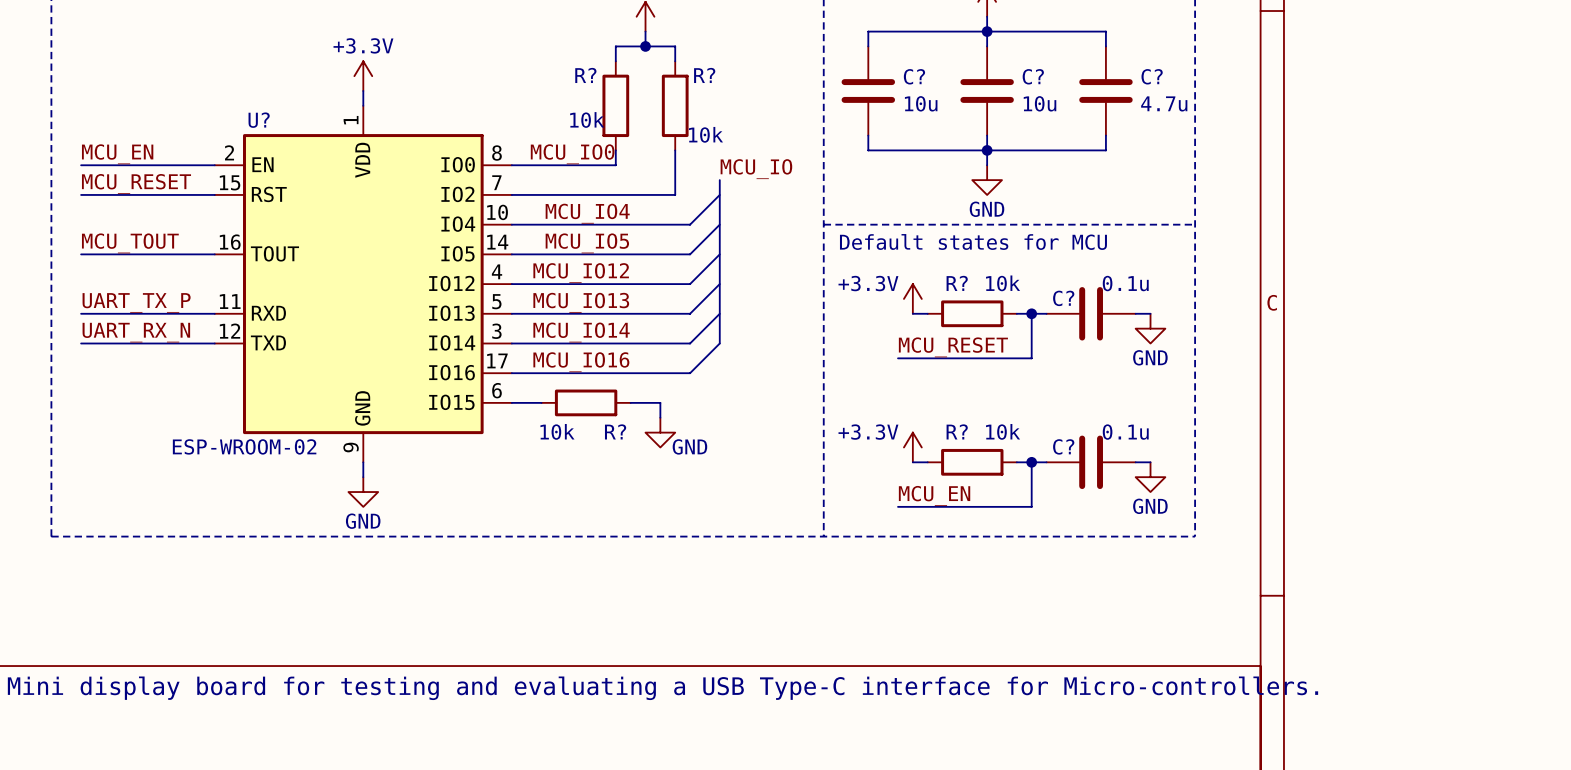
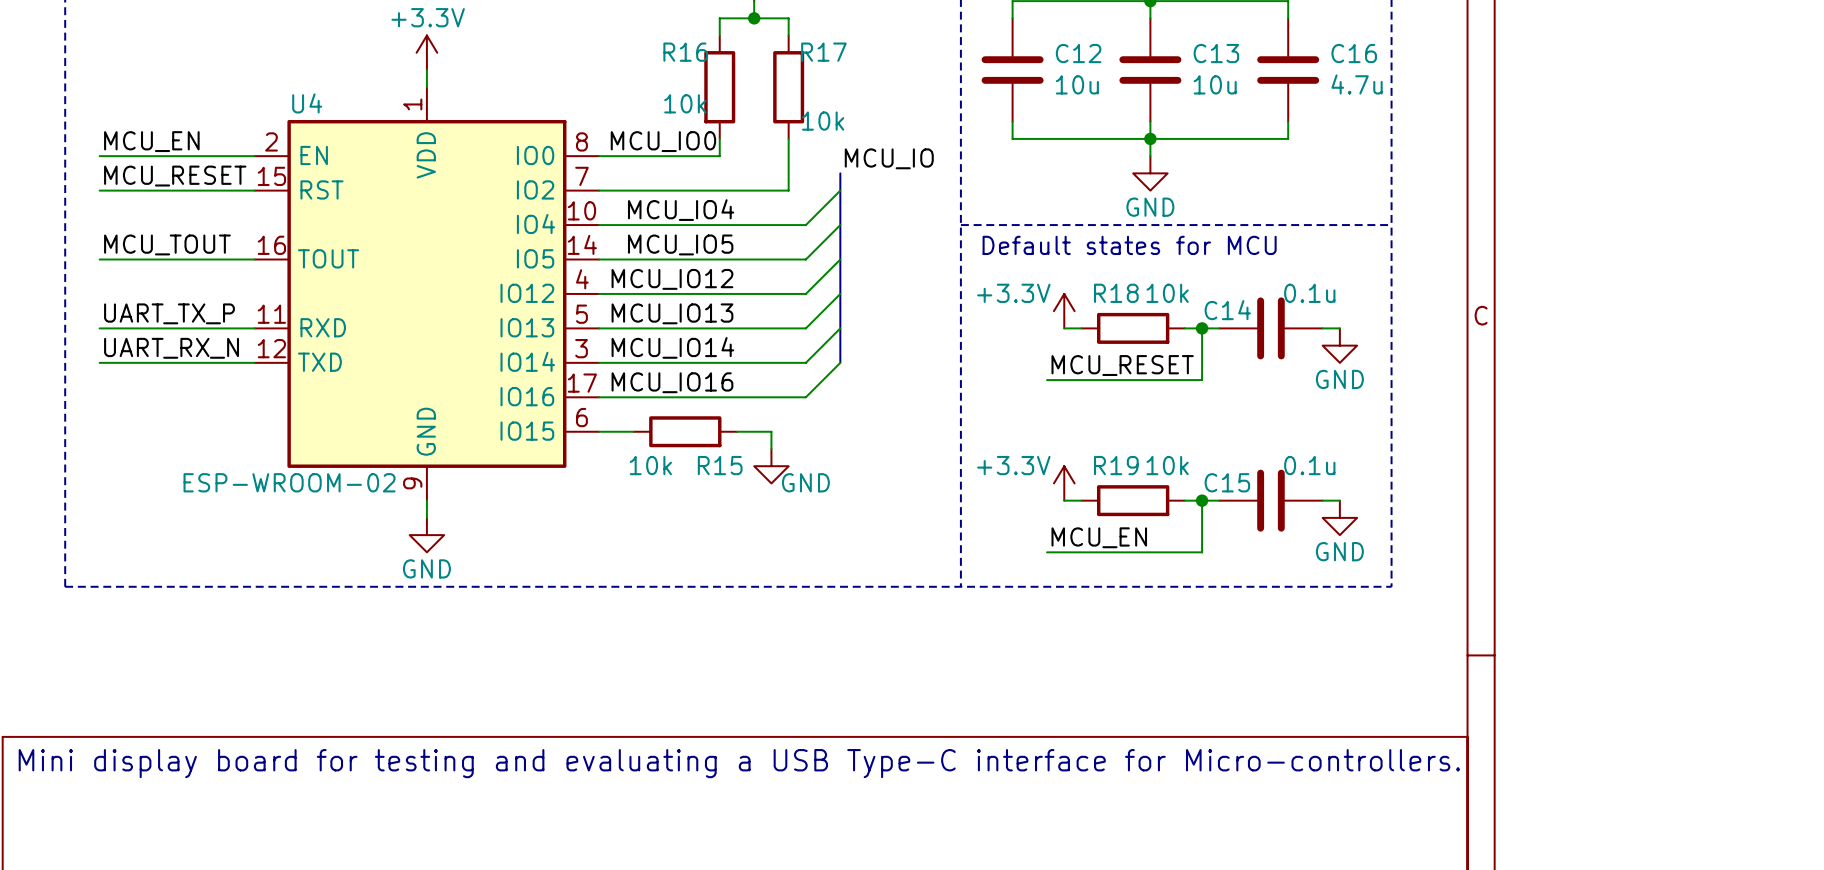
R? name: R? (585, 75) -> R16 (685, 52)
R? name: R? (704, 75) -> R17 (823, 52)
C? name: C? (914, 76) -> C12 (1078, 53)
C? name: C? (1033, 76) -> C13 (1216, 53)
C? name: C? (1152, 76) -> C16 (1354, 53)
U? name: U? (259, 120) -> U4 (307, 103)
R? name: R? (957, 283) -> R18 (1116, 293)
C? name: C? (1063, 298) -> C14 (1227, 310)
R? name: R? (615, 431) -> R15 (720, 465)
R? name: R? (957, 431) -> R19 (1116, 465)
C? name: C? (1063, 446) -> C15 (1227, 482)

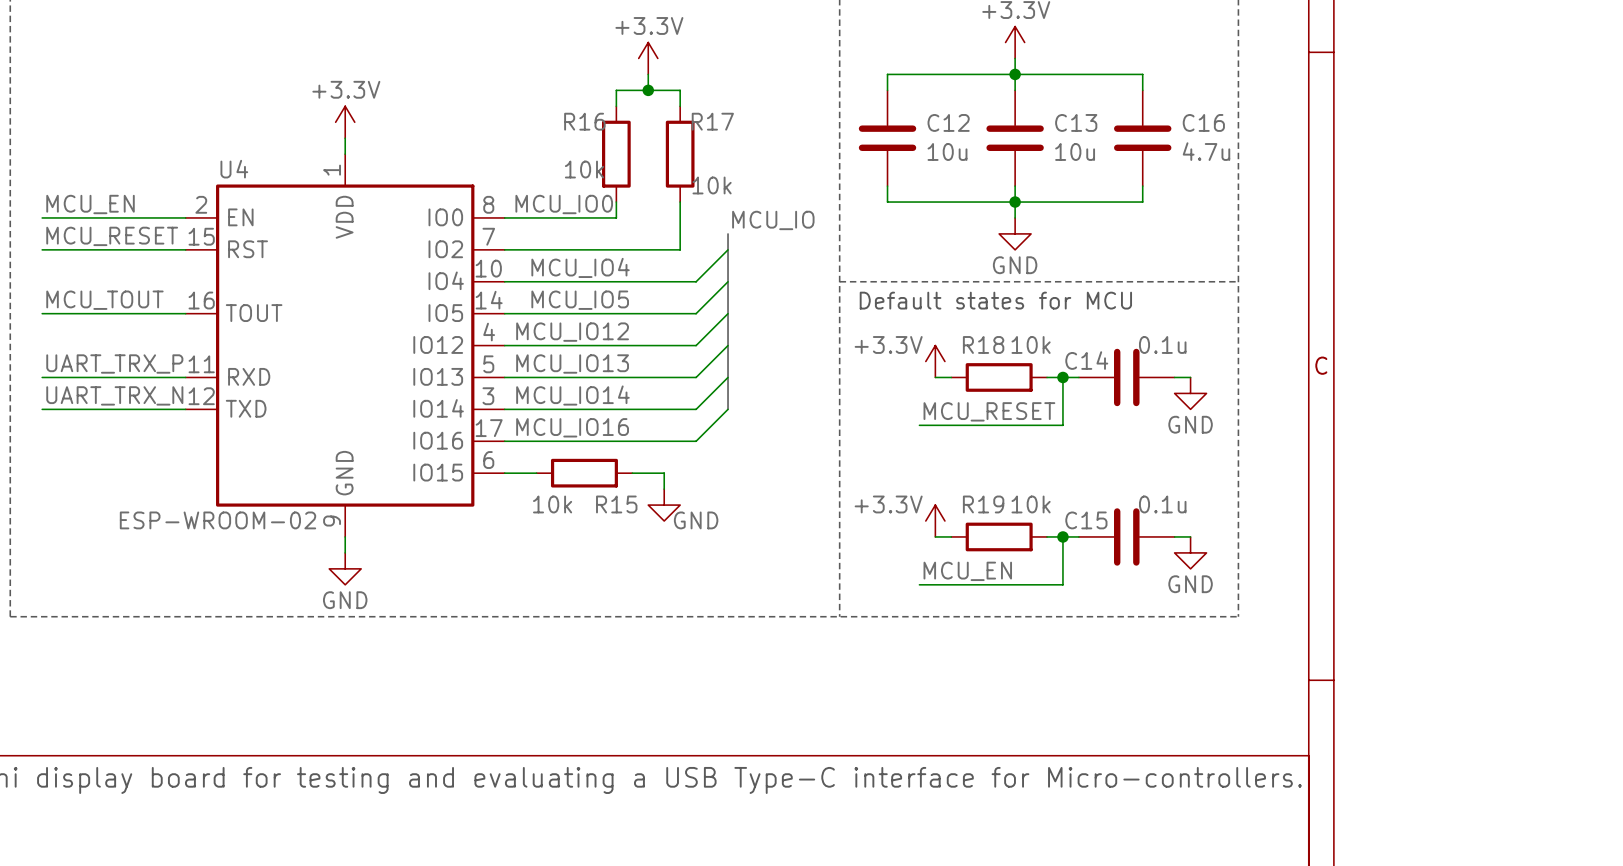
label: UART_TX_P (169, 313) -> UART_TRX_P (114, 364)
label: UART_RX_N (171, 348) -> UART_TRX_N (114, 395)

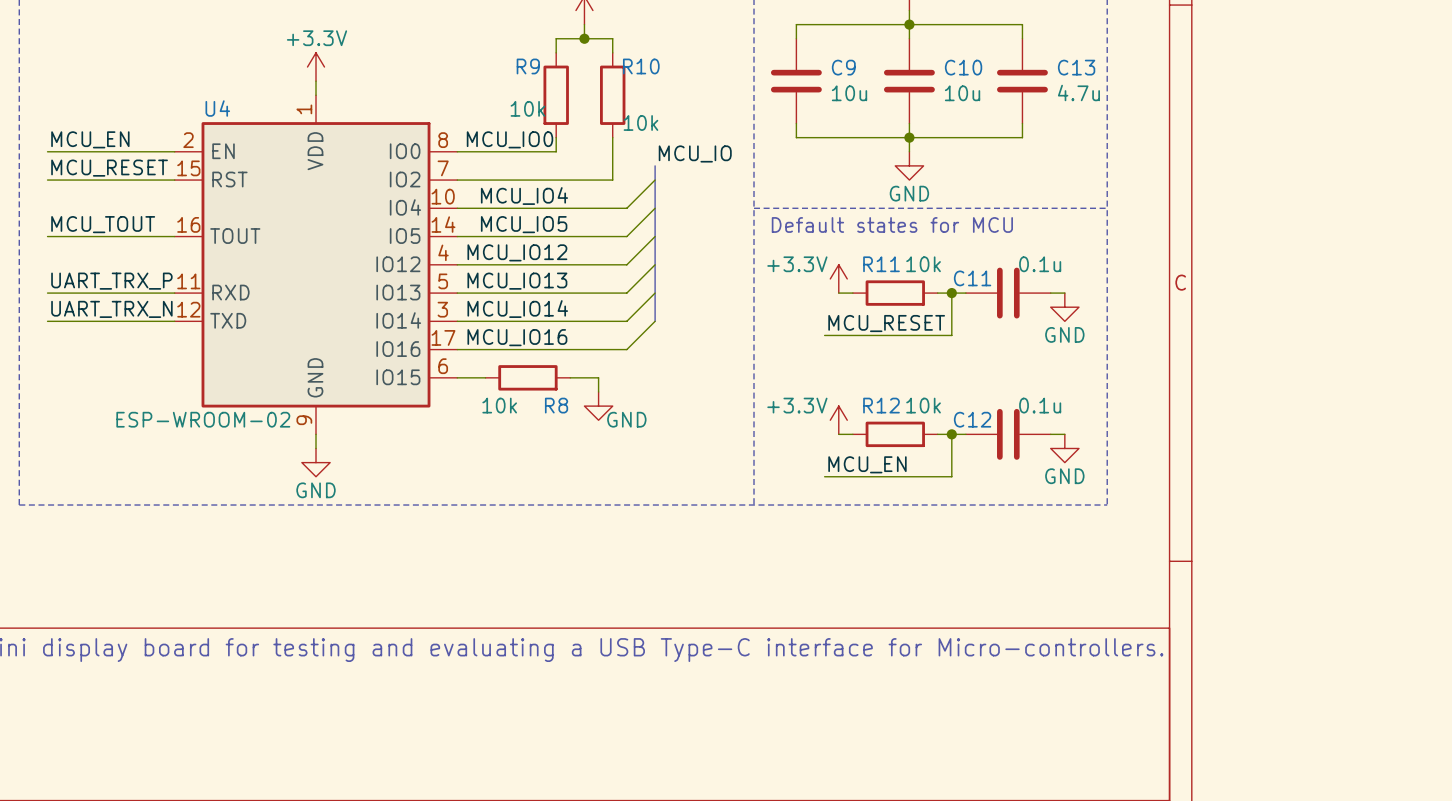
R16 name: R16 (584, 121) -> R9 (528, 66)
R17 name: R17 (712, 121) -> R10 (641, 66)
C12 name: C12 (948, 122) -> C9 (843, 67)
C13 name: C13 (1076, 122) -> C10 (963, 67)
C16 name: C16 (1203, 122) -> C13 (1076, 67)
R18 name: R18 (983, 344) -> R11 (881, 264)
C14 name: C14 (1086, 360) -> C11 (972, 278)
R15 name: R15 (616, 504) -> R8 (556, 405)
R19 name: R19 (983, 504) -> R12 (881, 405)
C15 name: C15 (1086, 520) -> C12 (972, 419)

